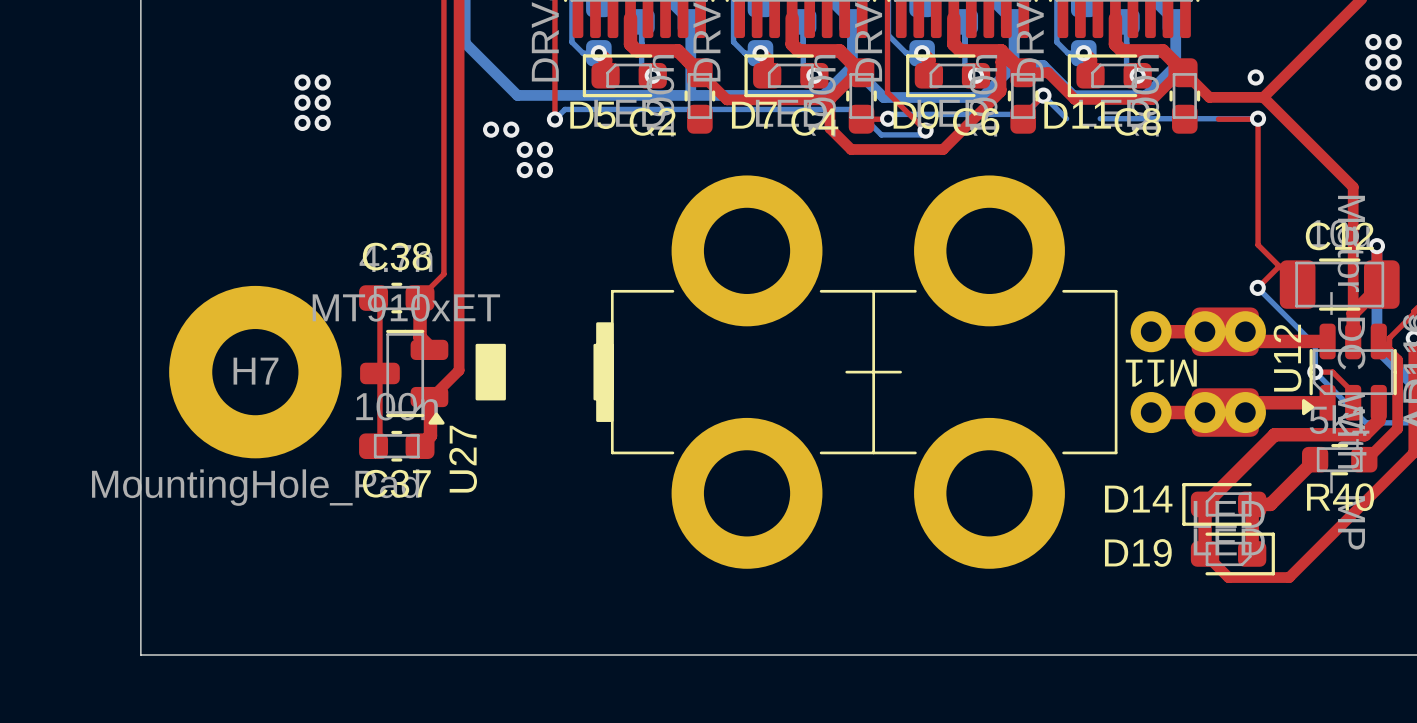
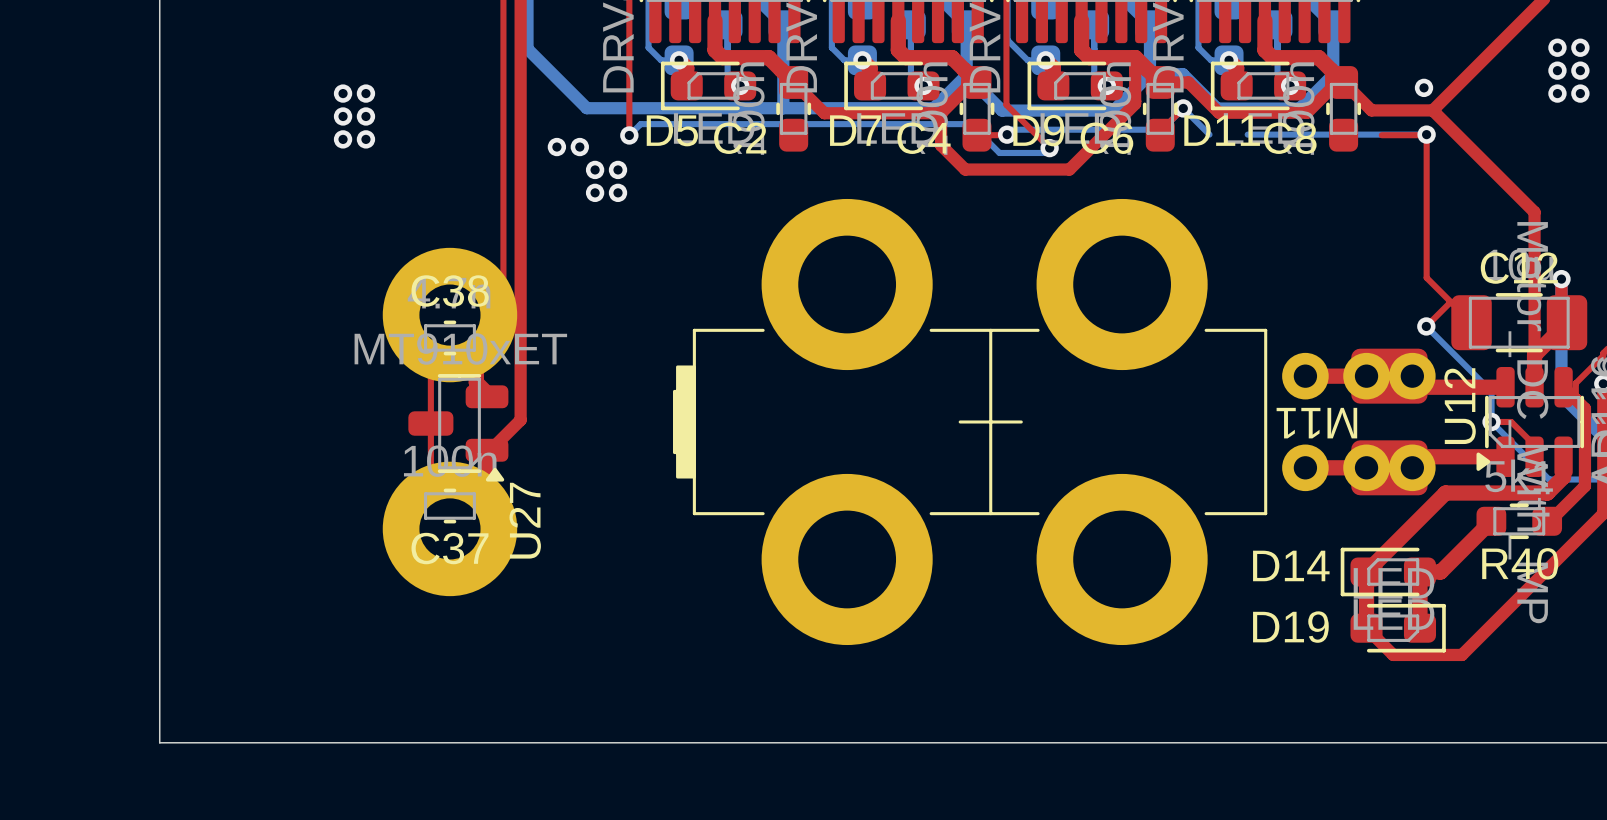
M11 footprint: [475, 175, 1266, 569] -> [382, 198, 1436, 646]
H7: MountingHole_Pad (255, 372) -> none

